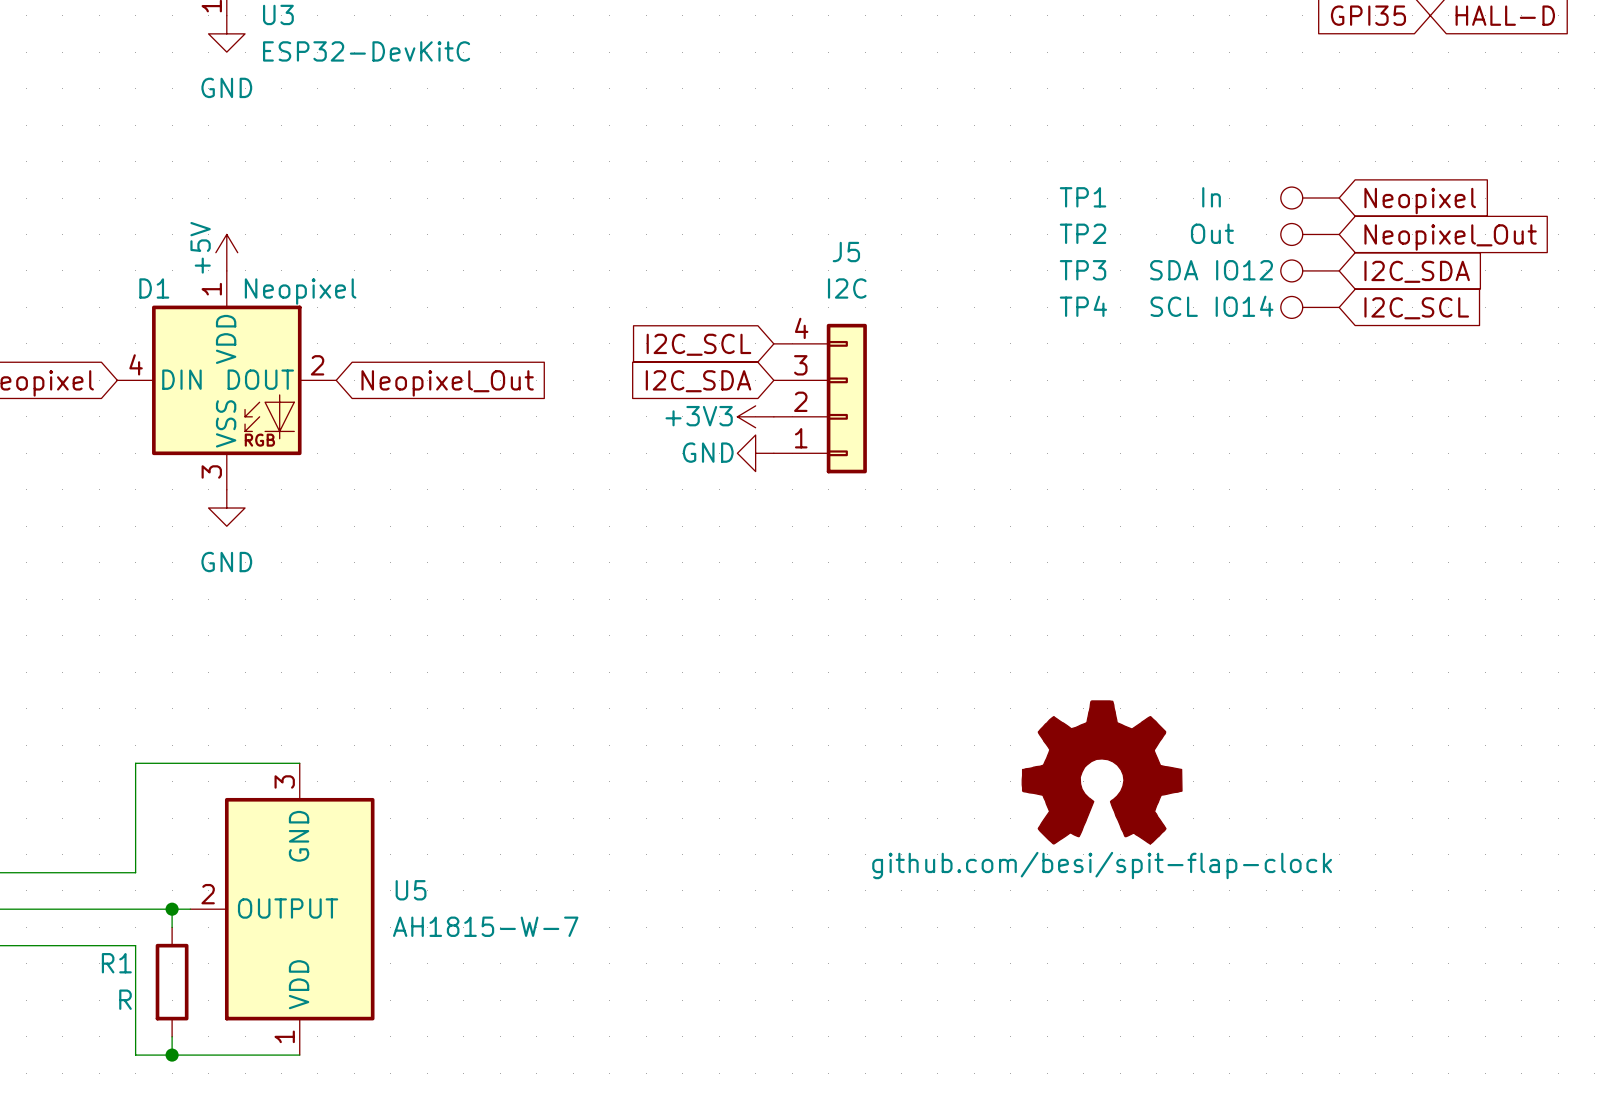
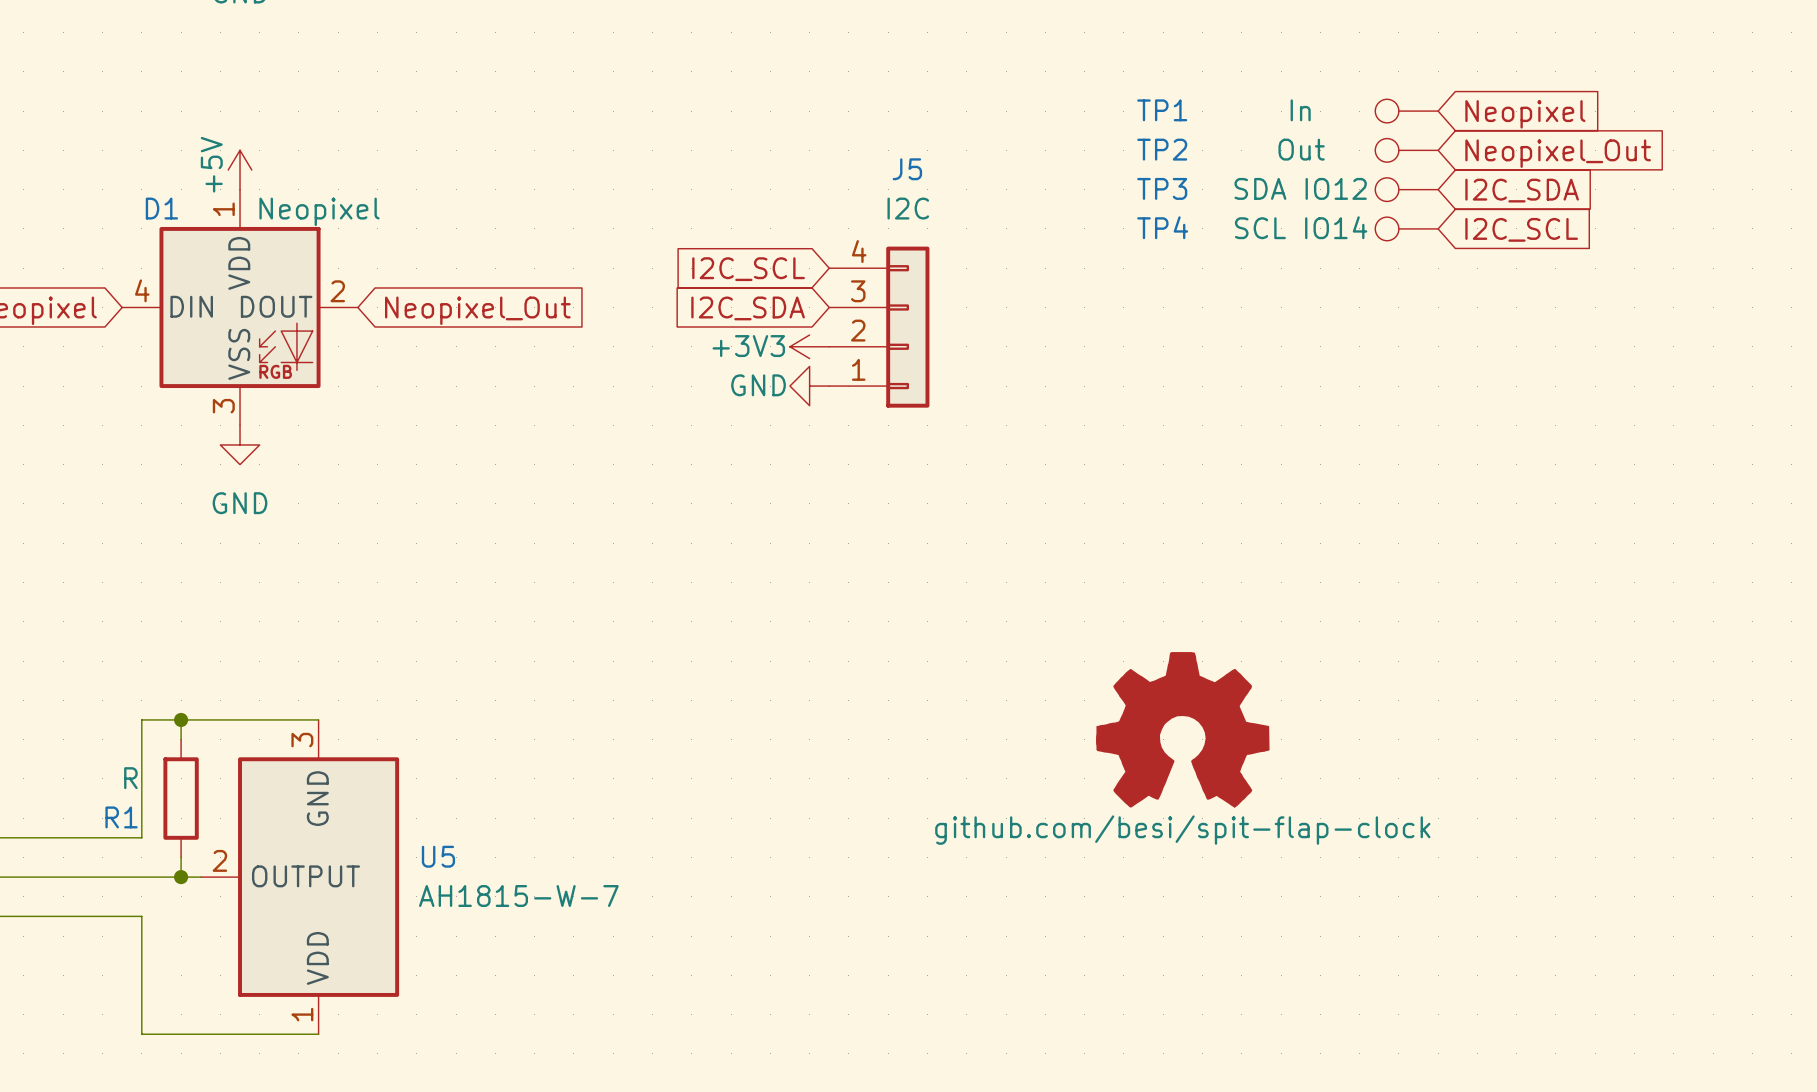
junction: none -> (181, 719)
wire: (172, 909) (172, 927) -> (181, 877) (181, 857)
R1 name position: R1 (116, 963) -> R1 (121, 817)
R1 position: (172, 982) -> (181, 798)
R1 value position: R (125, 999) -> R (130, 778)
wire: (172, 1036) (172, 1055) -> (181, 719) (181, 739)
junction: (172, 1055) -> none

